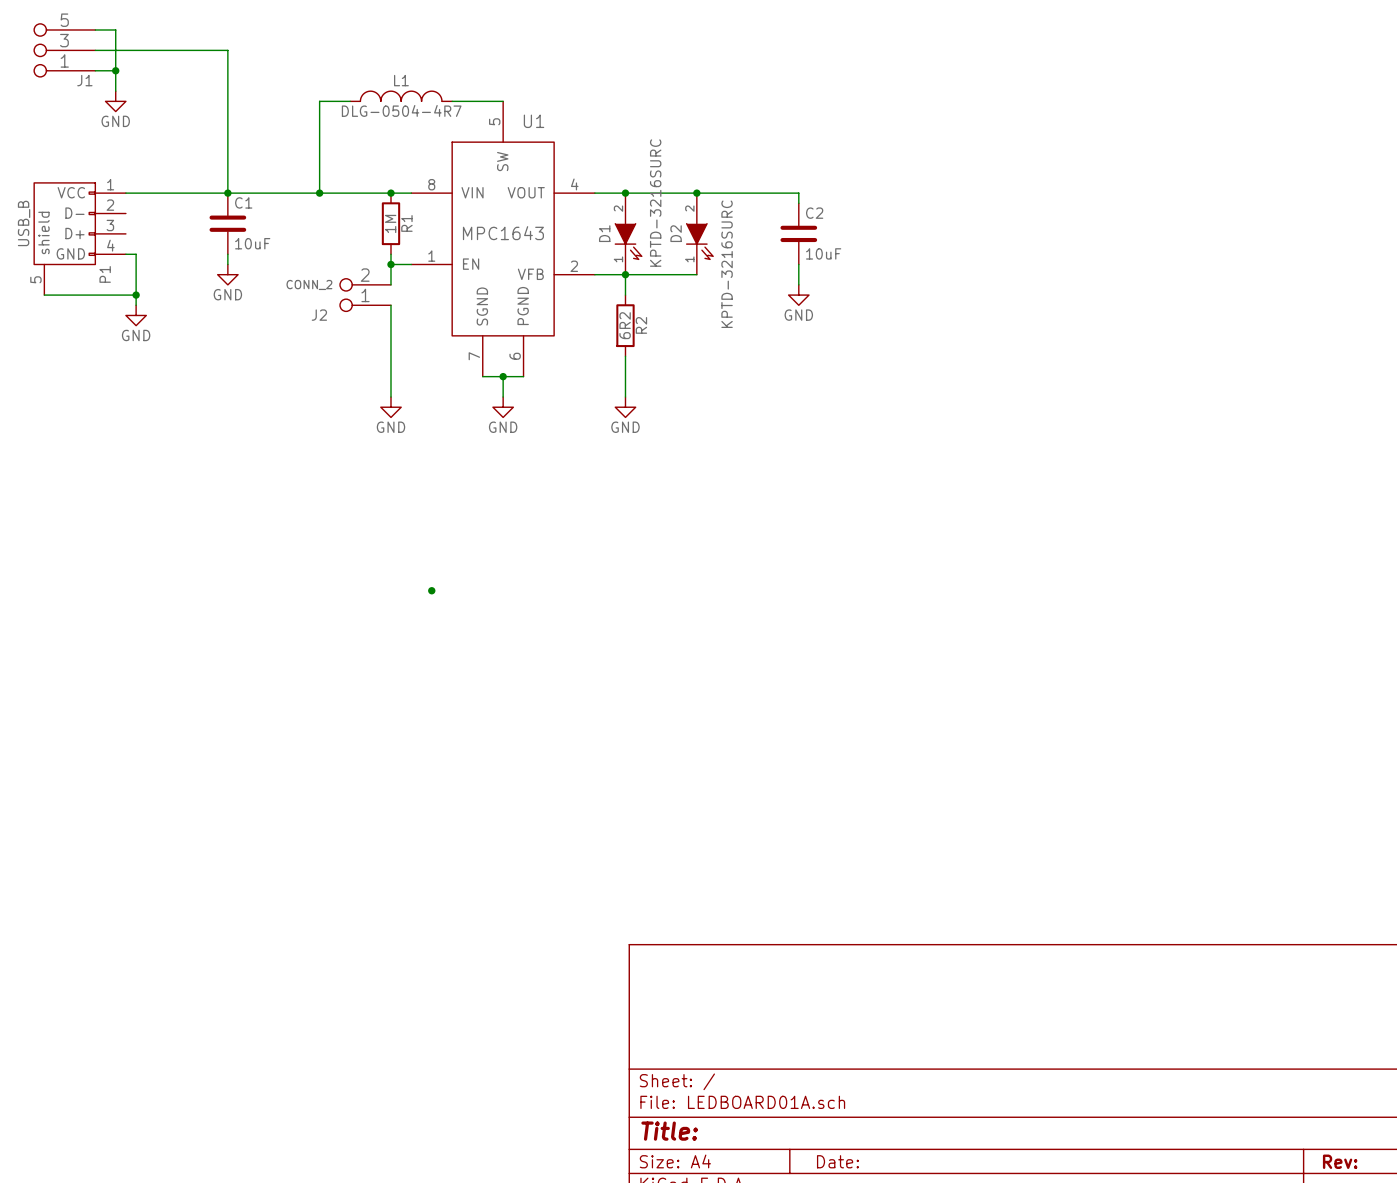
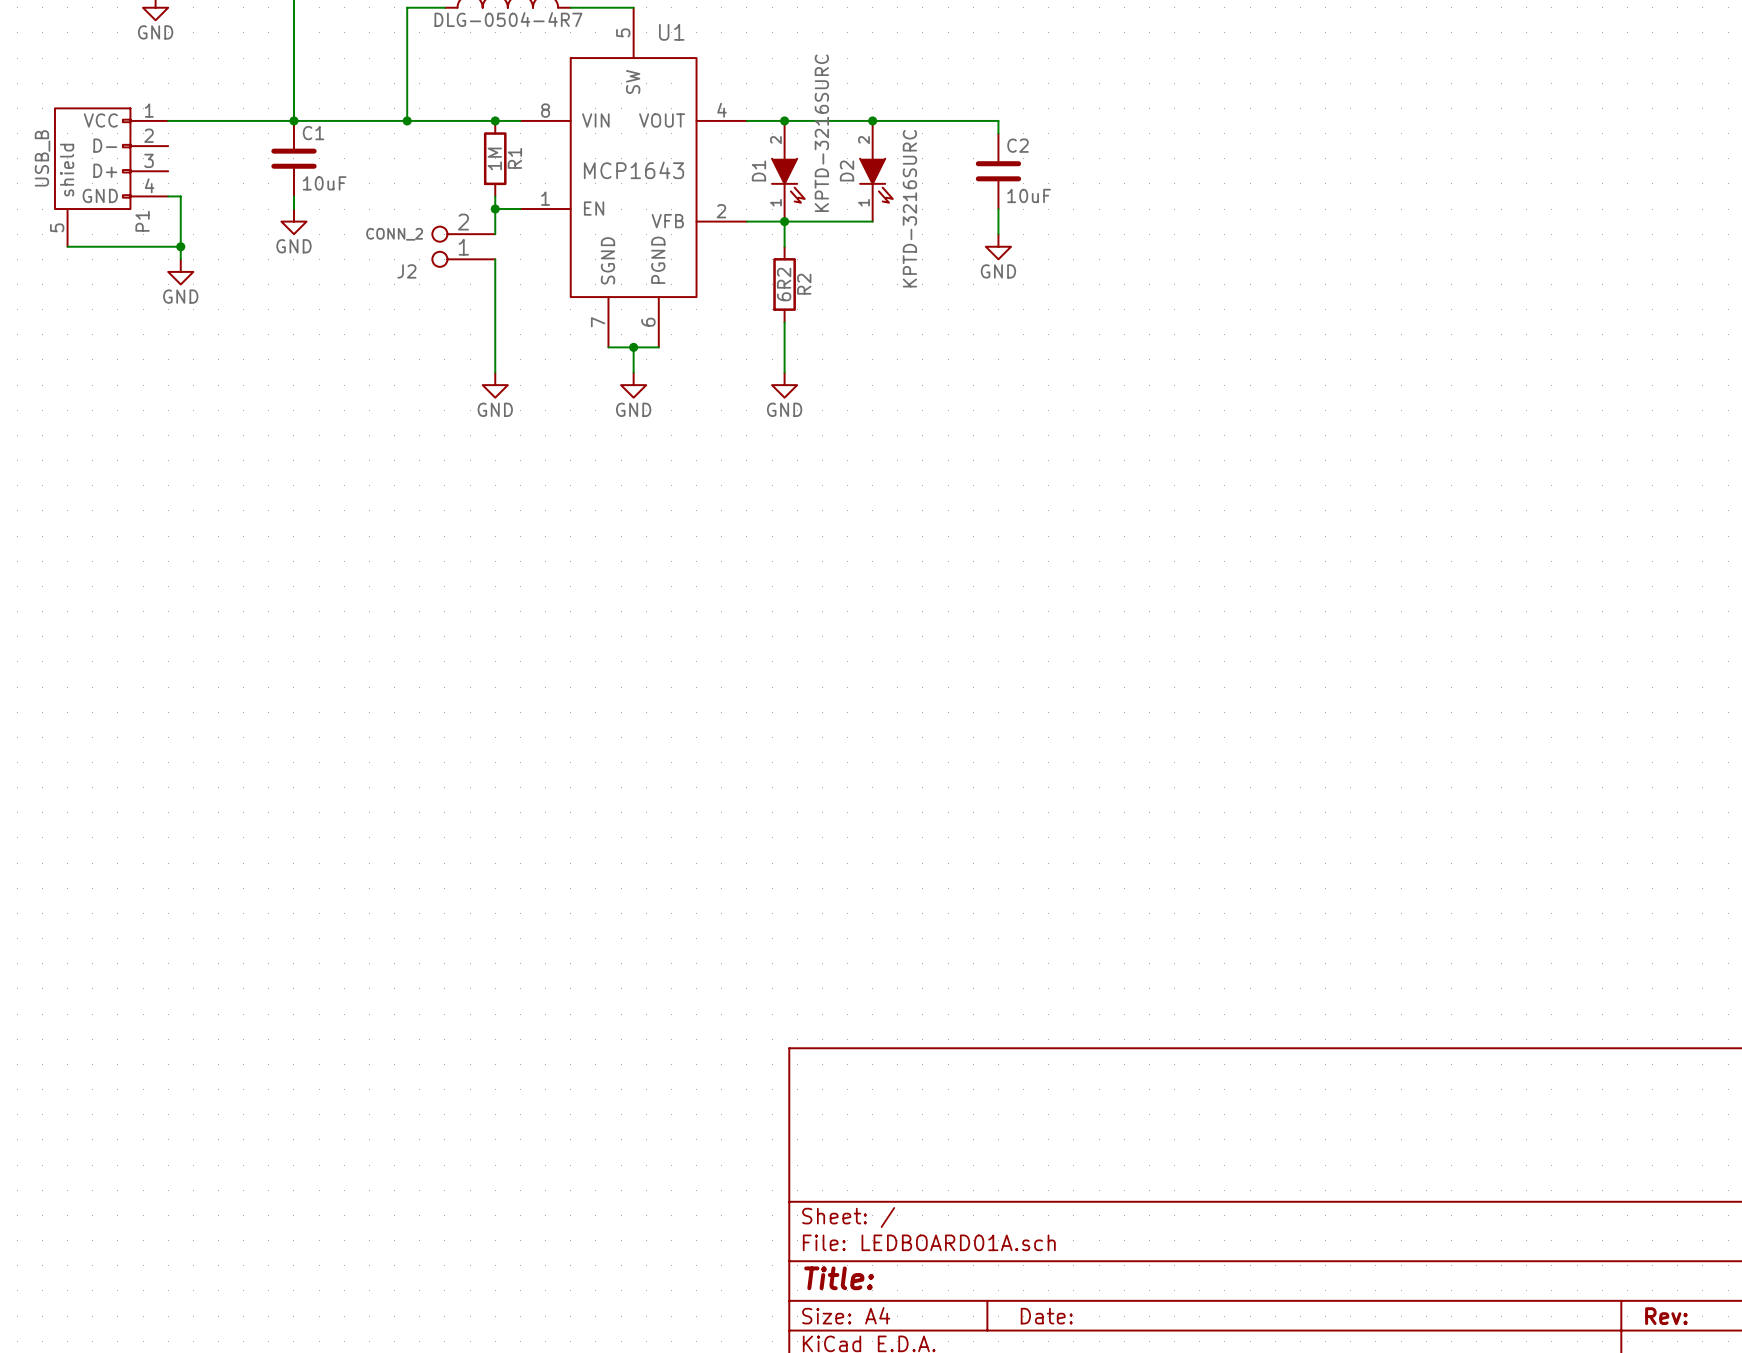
U1 value: MPC1643 (503, 233) -> MCP1643 (633, 170)
junction: (431, 590) -> none

